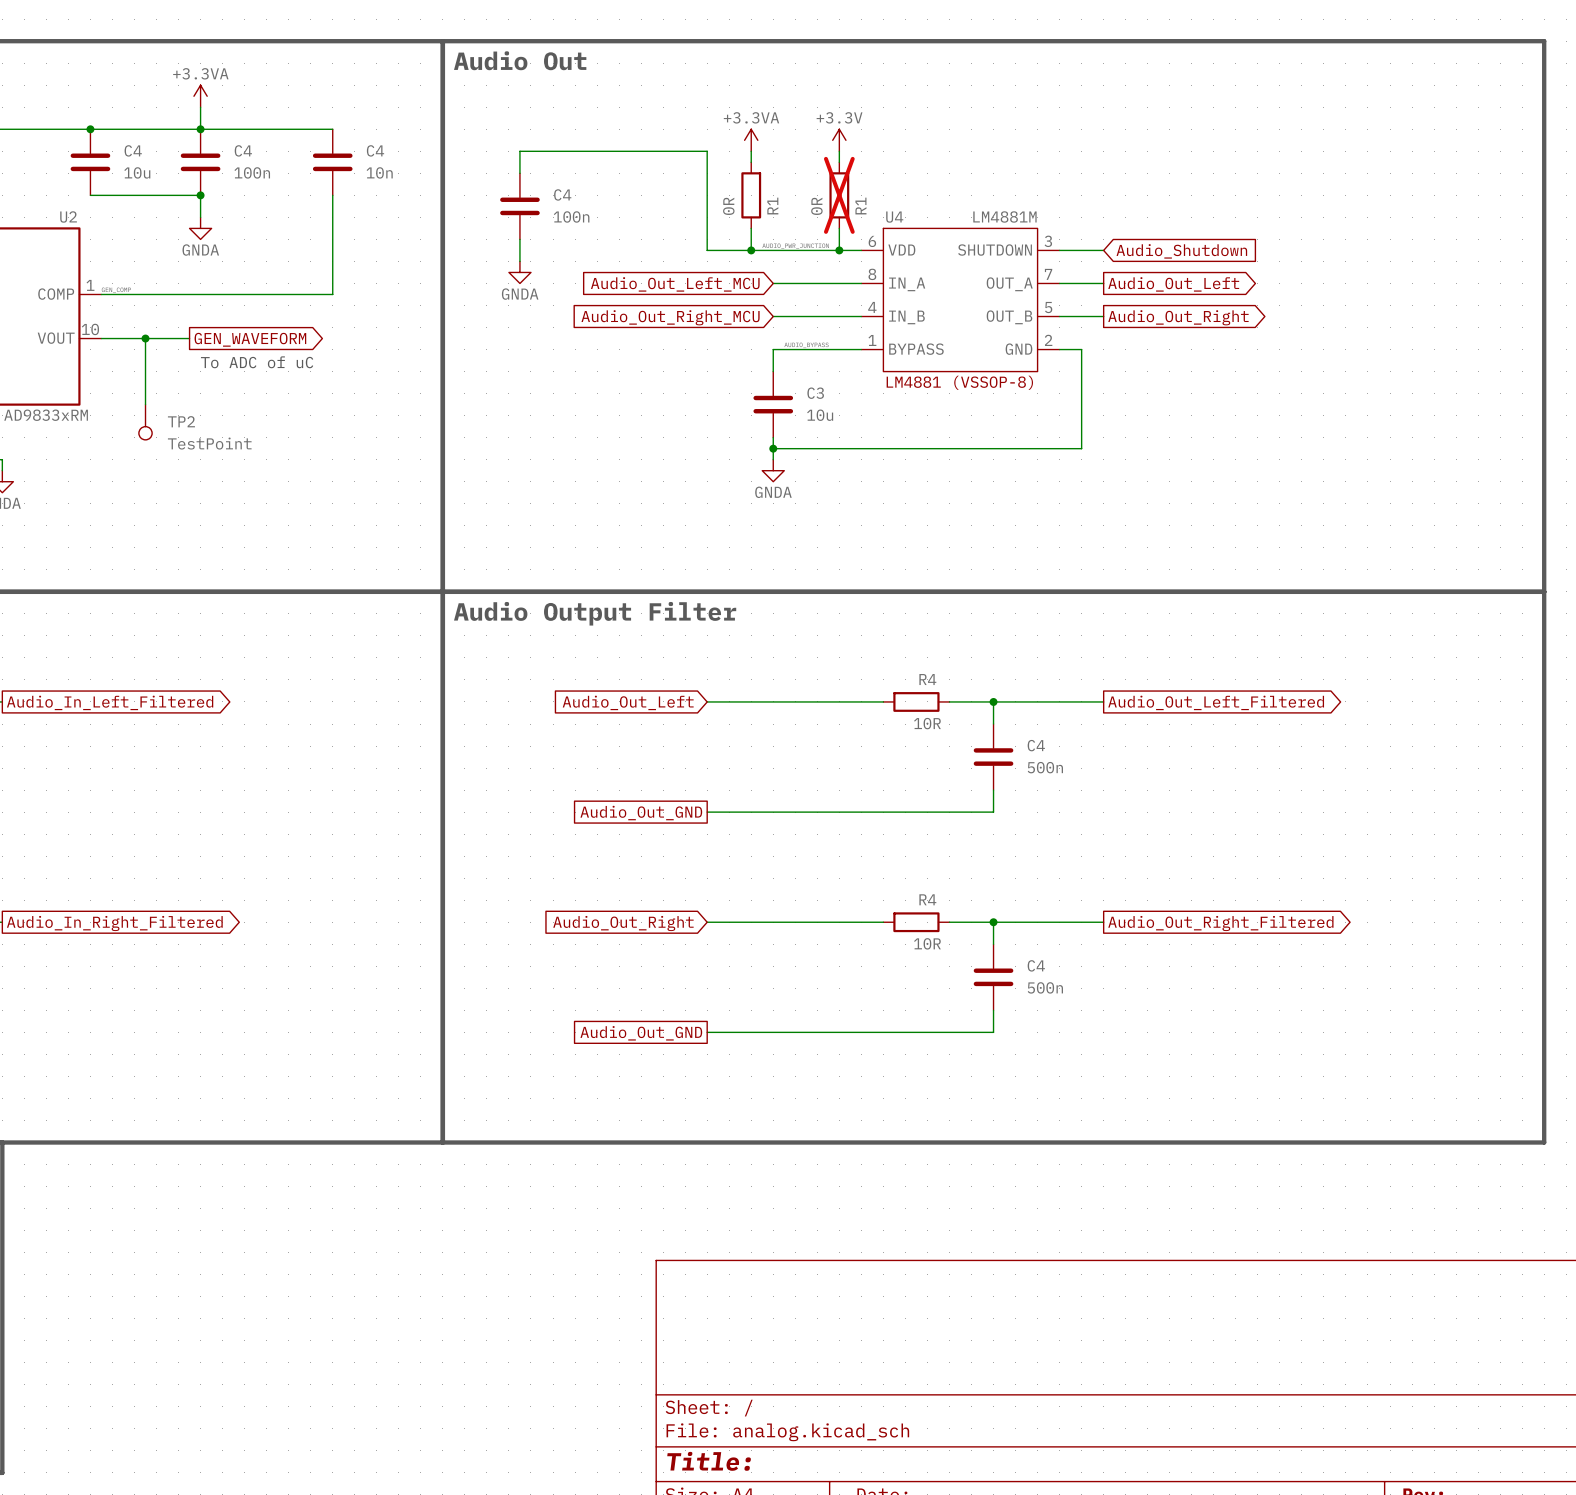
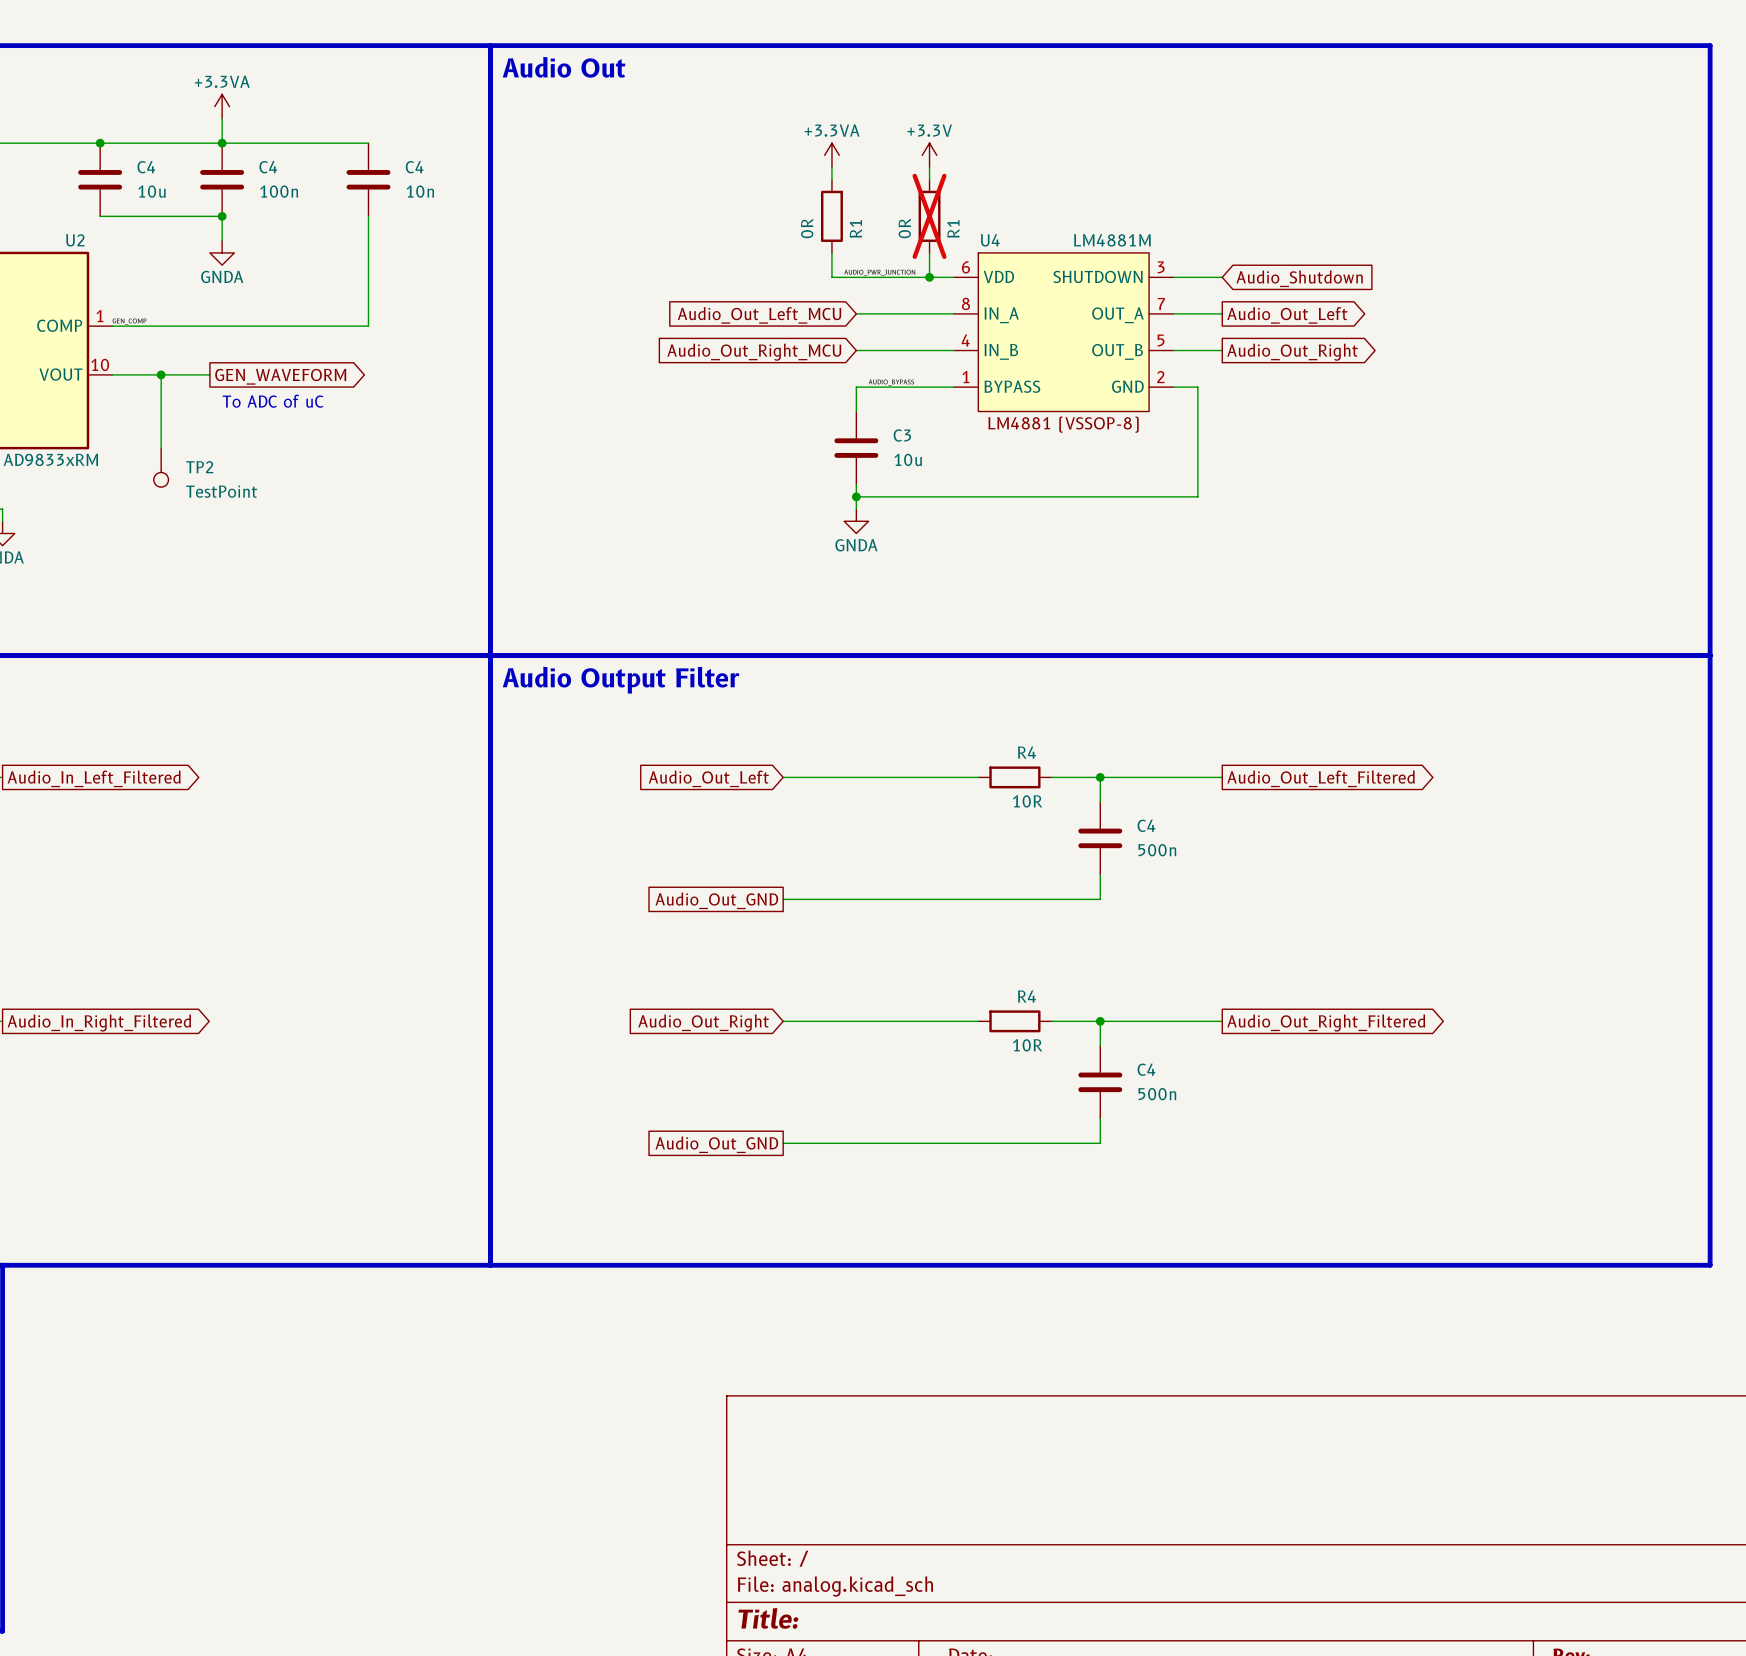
wire: (519, 173) (519, 151) (707, 151) (707, 250) (751, 250) -> none
C4: 100n (519, 206) -> none
wire: (519, 239) (519, 261) -> none
junction: (751, 250) -> none
power symbol: GNDA (519, 272) -> none

